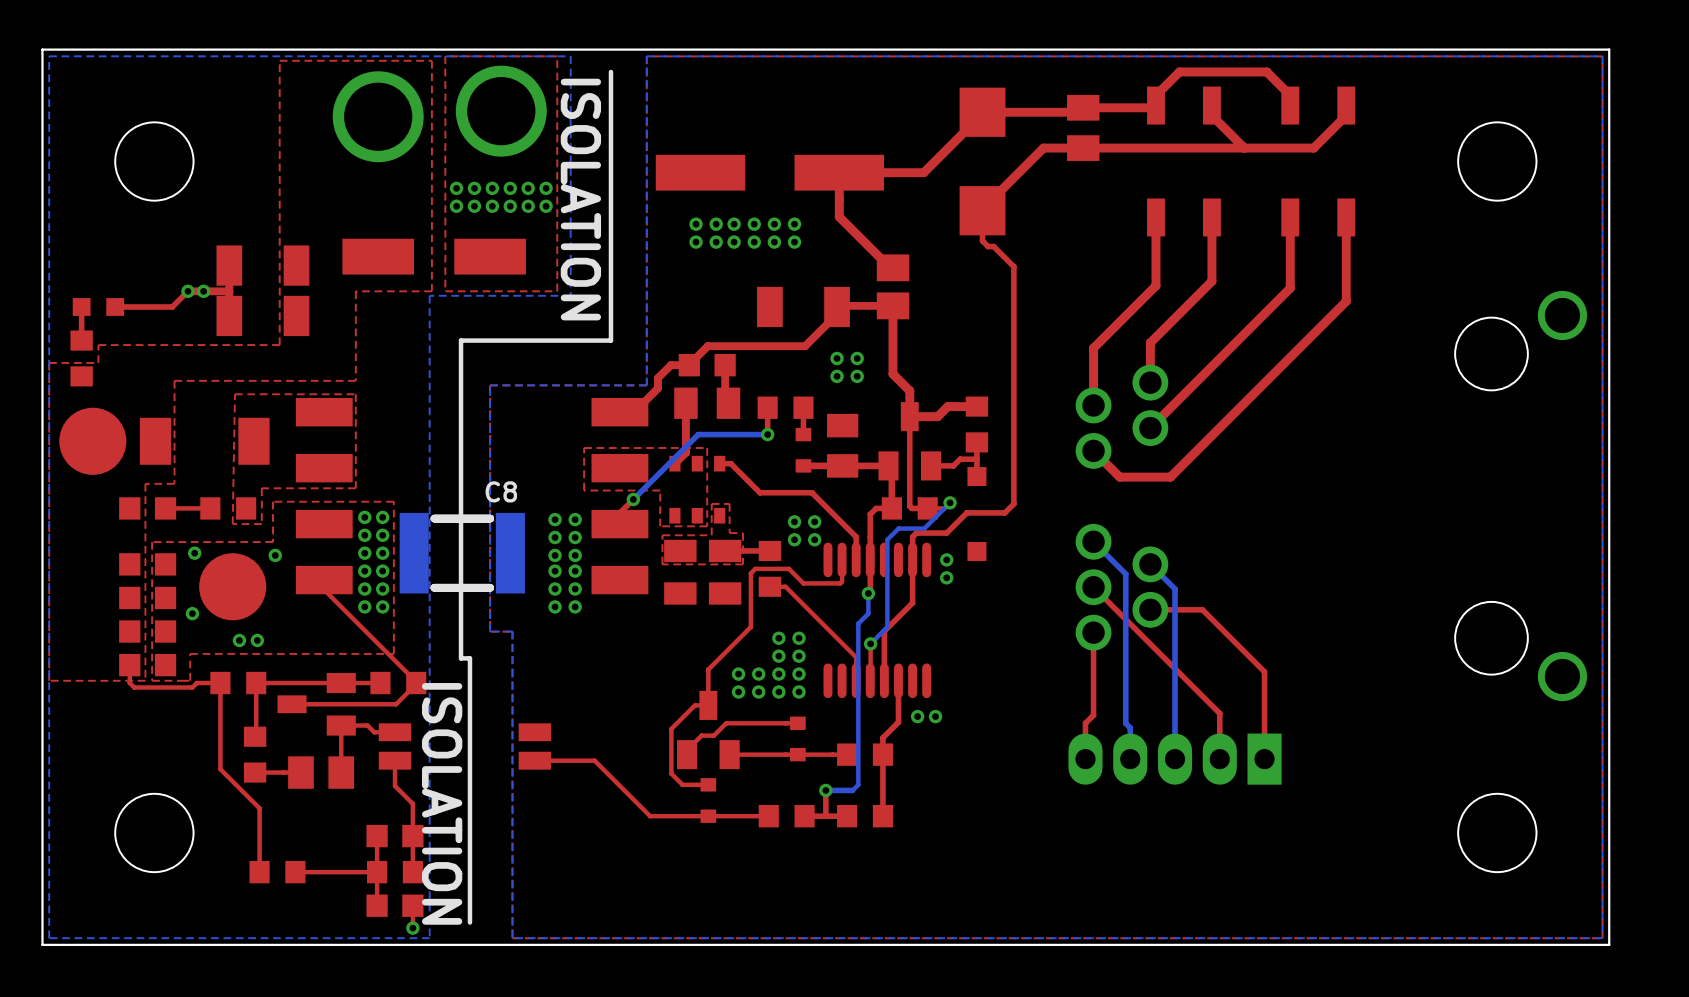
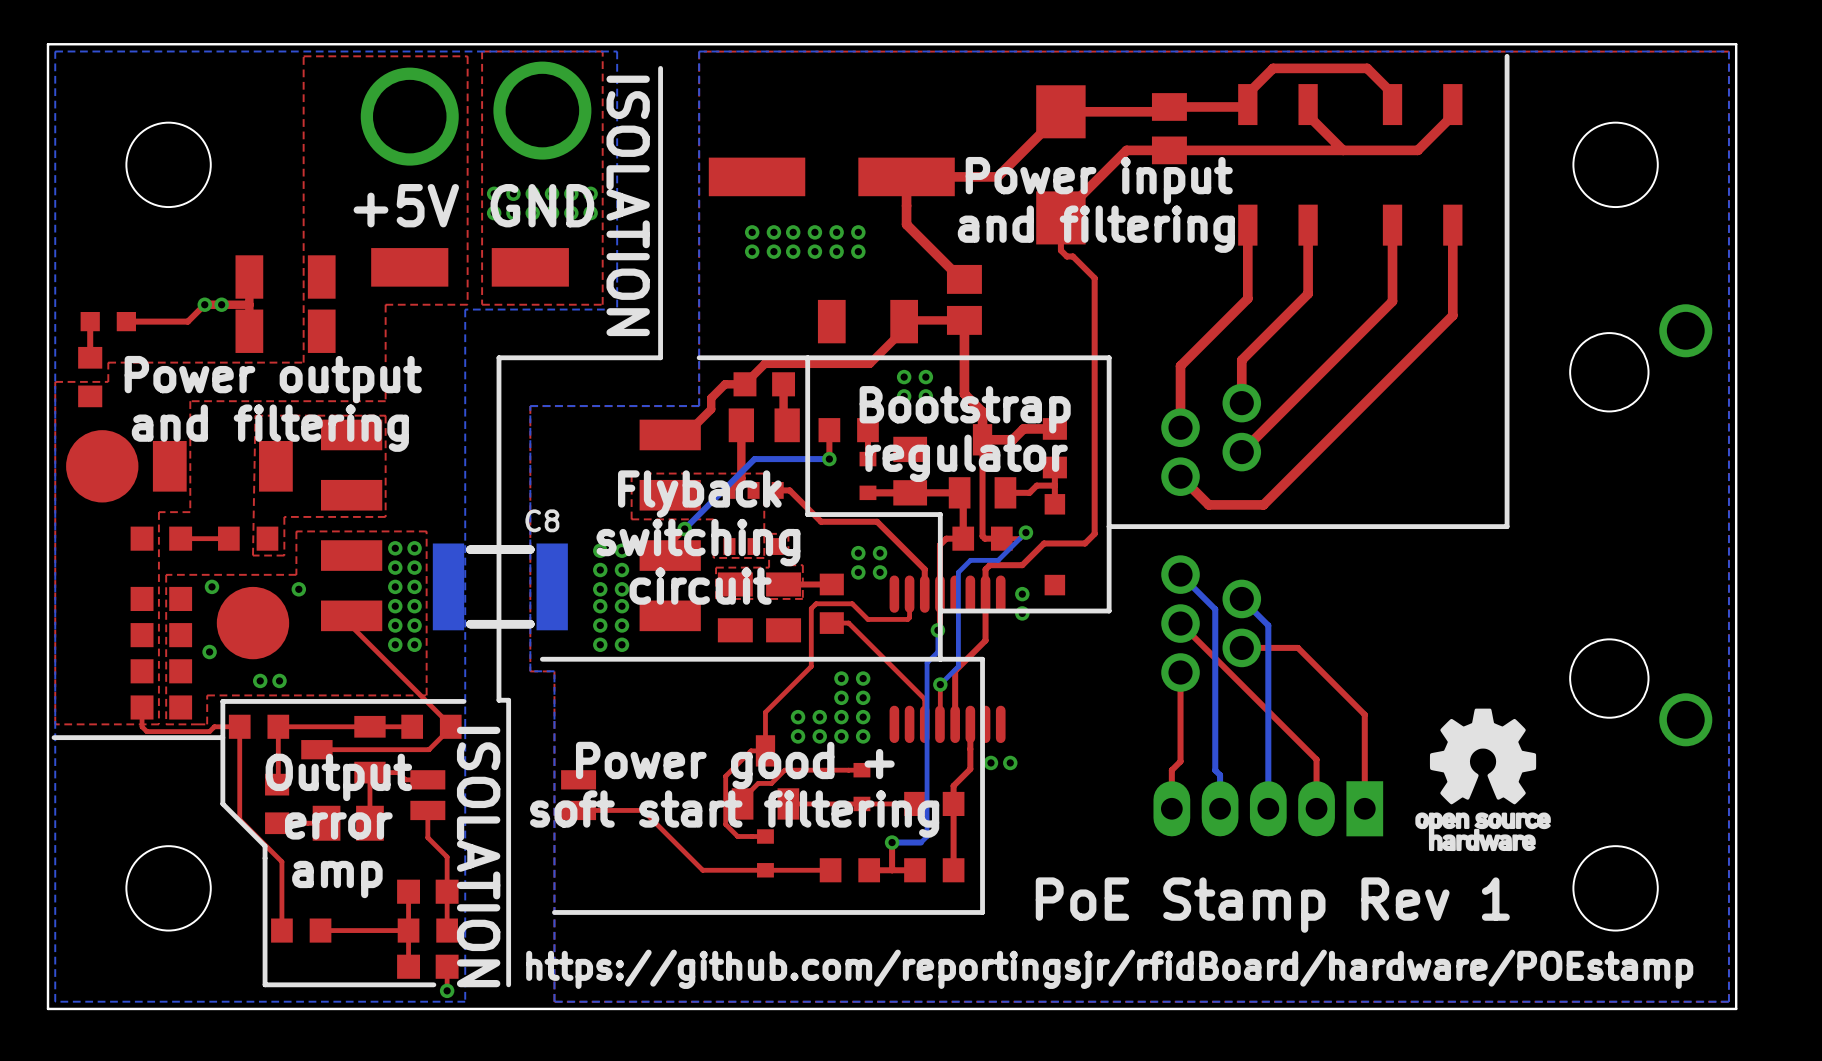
line: none -> (1507, 56) (1507, 526) (1109, 526)
text: none -> Power input (1099, 180)
text: none -> +5V (406, 205)
text: none -> GND (542, 205)
text: none -> and filtering (1096, 229)
line: none -> (699, 357) (1109, 357) (1109, 611) (940, 611)
line: none -> (807, 357) (807, 514) (940, 514) (940, 659)
text: none -> Power output (273, 379)
text: none -> Bootstrap (965, 409)
text: none -> and filtering (270, 428)
text: none -> regulator (966, 458)
text: none -> Flyback (699, 494)
text: none -> switching (698, 542)
text: none -> circuit (700, 586)
line: none -> (542, 659) (982, 659) (982, 912) (554, 912)
line: none -> (464, 701) (222, 701) (222, 803) (265, 846) (265, 984) (433, 984)
drawing: none -> [1415, 708, 1551, 852]
line: none -> (222, 737) (54, 737)
text: none -> Power good + (735, 765)
text: none -> Output (338, 777)
text: none -> soft start filtering (734, 814)
text: none -> error (338, 825)
text: none -> amp (337, 879)
text: none -> PoE Stamp Rev 1 (1272, 905)
text: none -> https://github.com/reportingsjr/rfidBoard/hardware/POEstamp (1109, 969)

